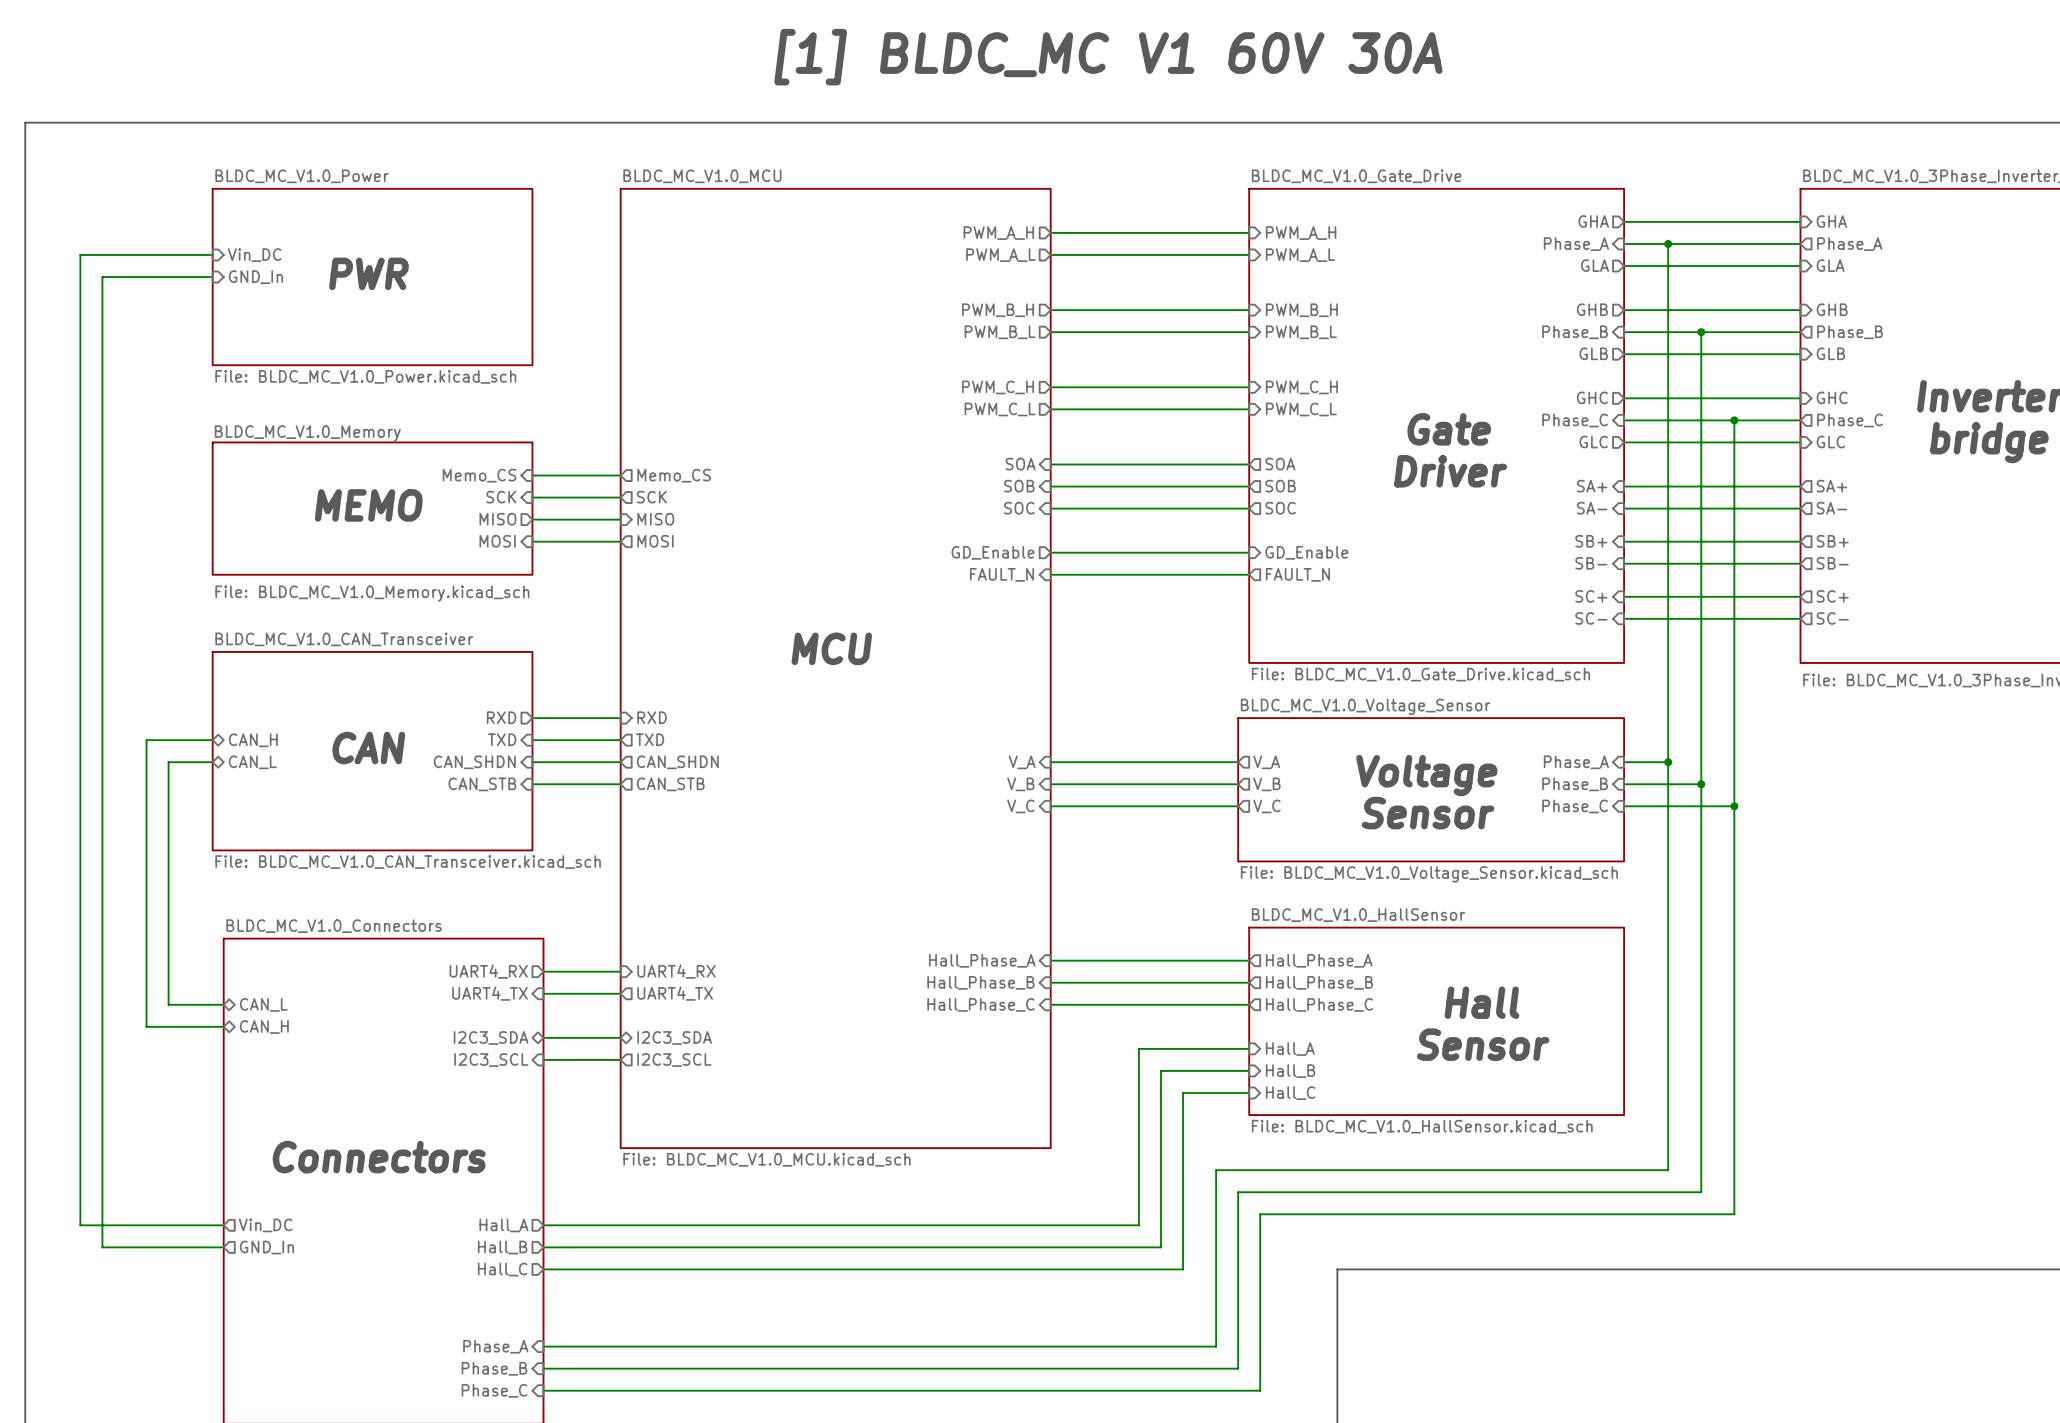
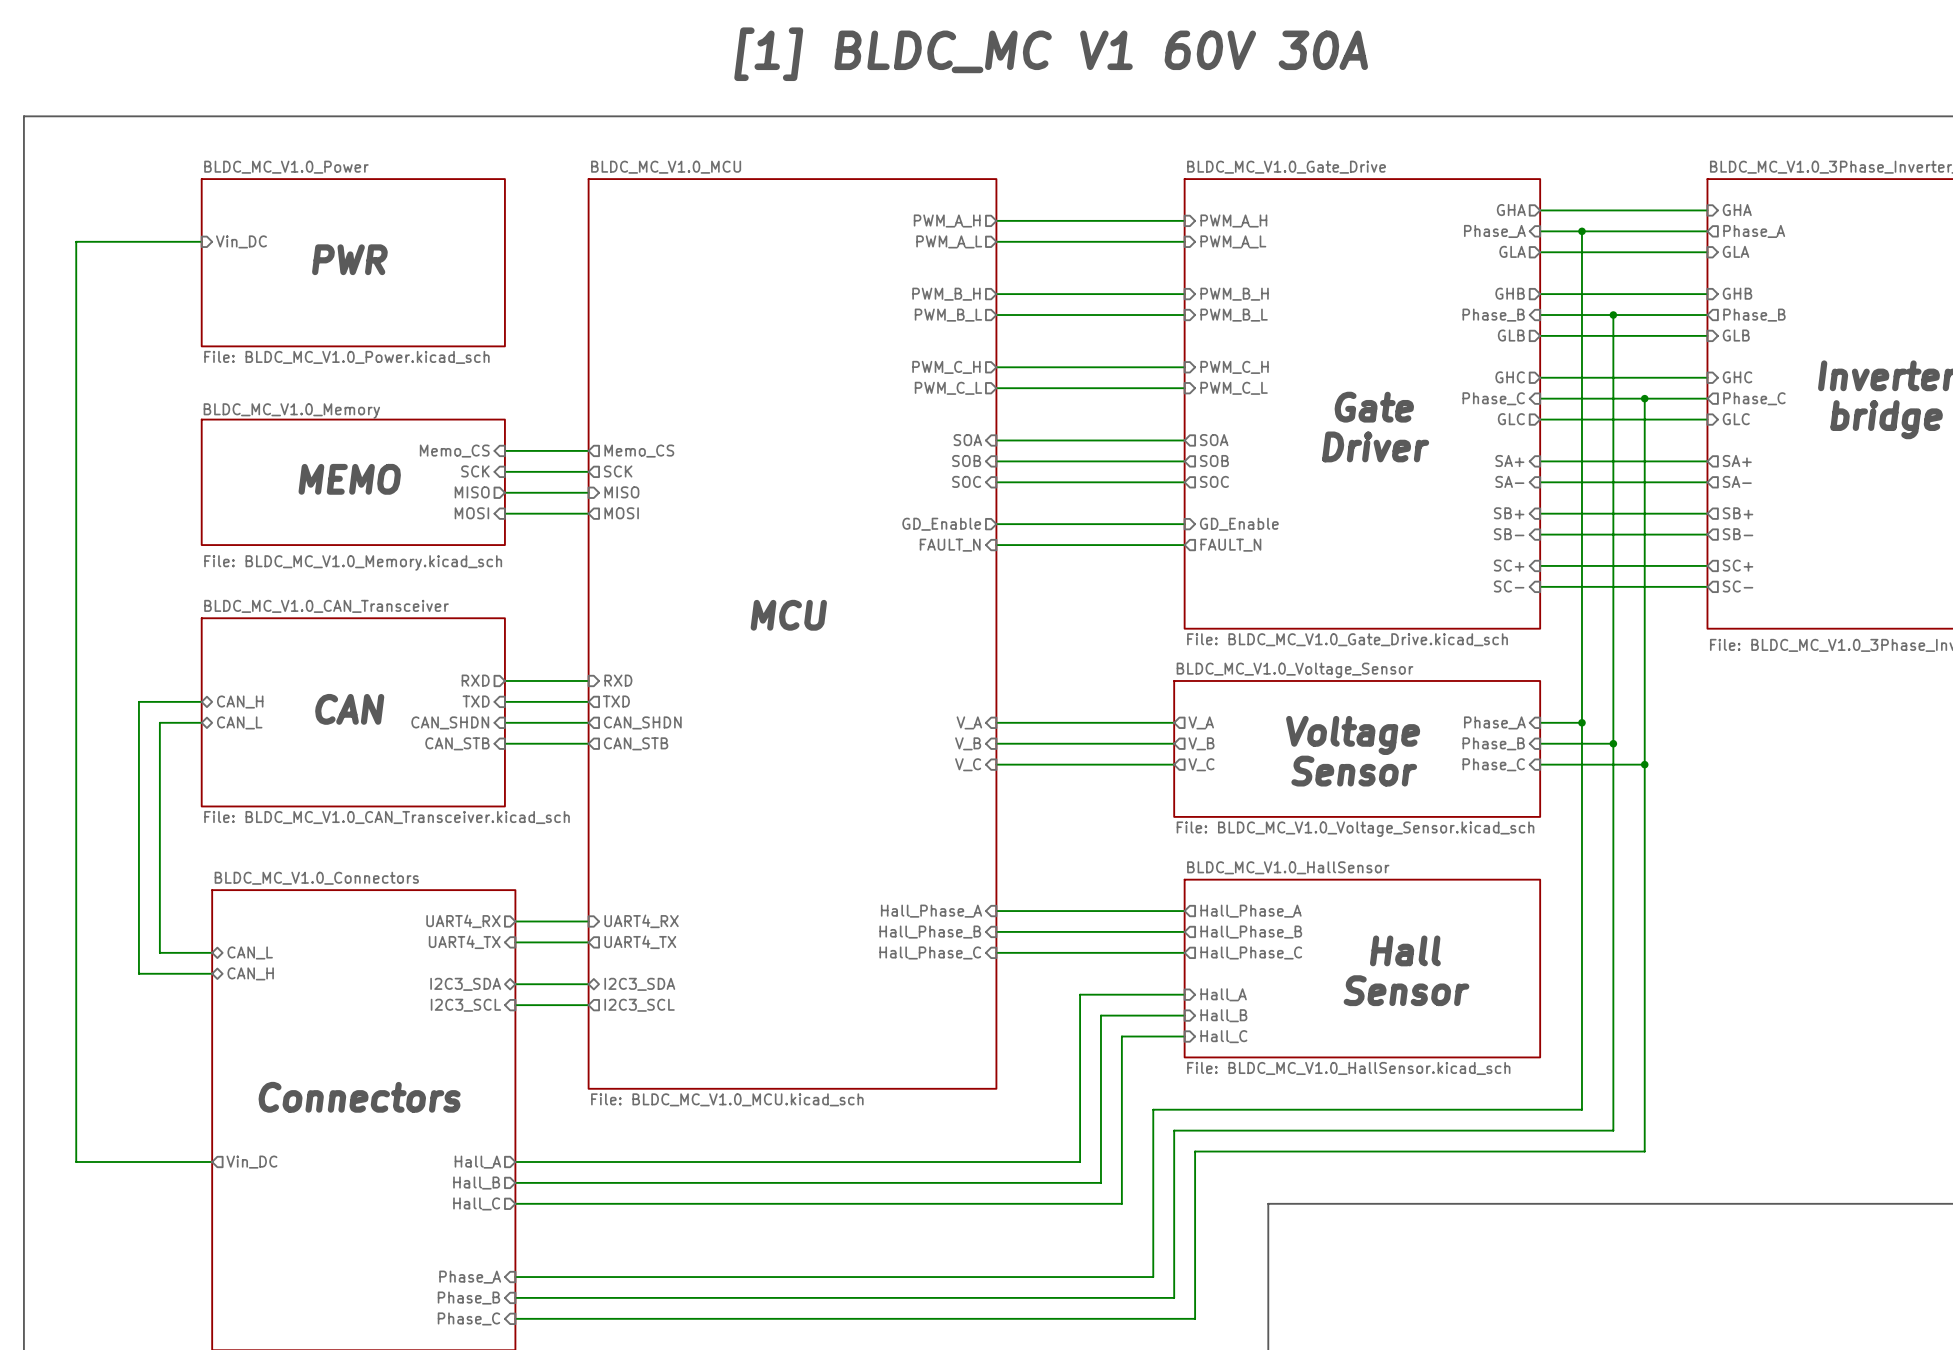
wire: (212, 277) (102, 277) (102, 1247) (223, 1247) -> none
sheet pin: GND_In (255, 277) -> none
sheet pin: GND_In (266, 1247) -> none

